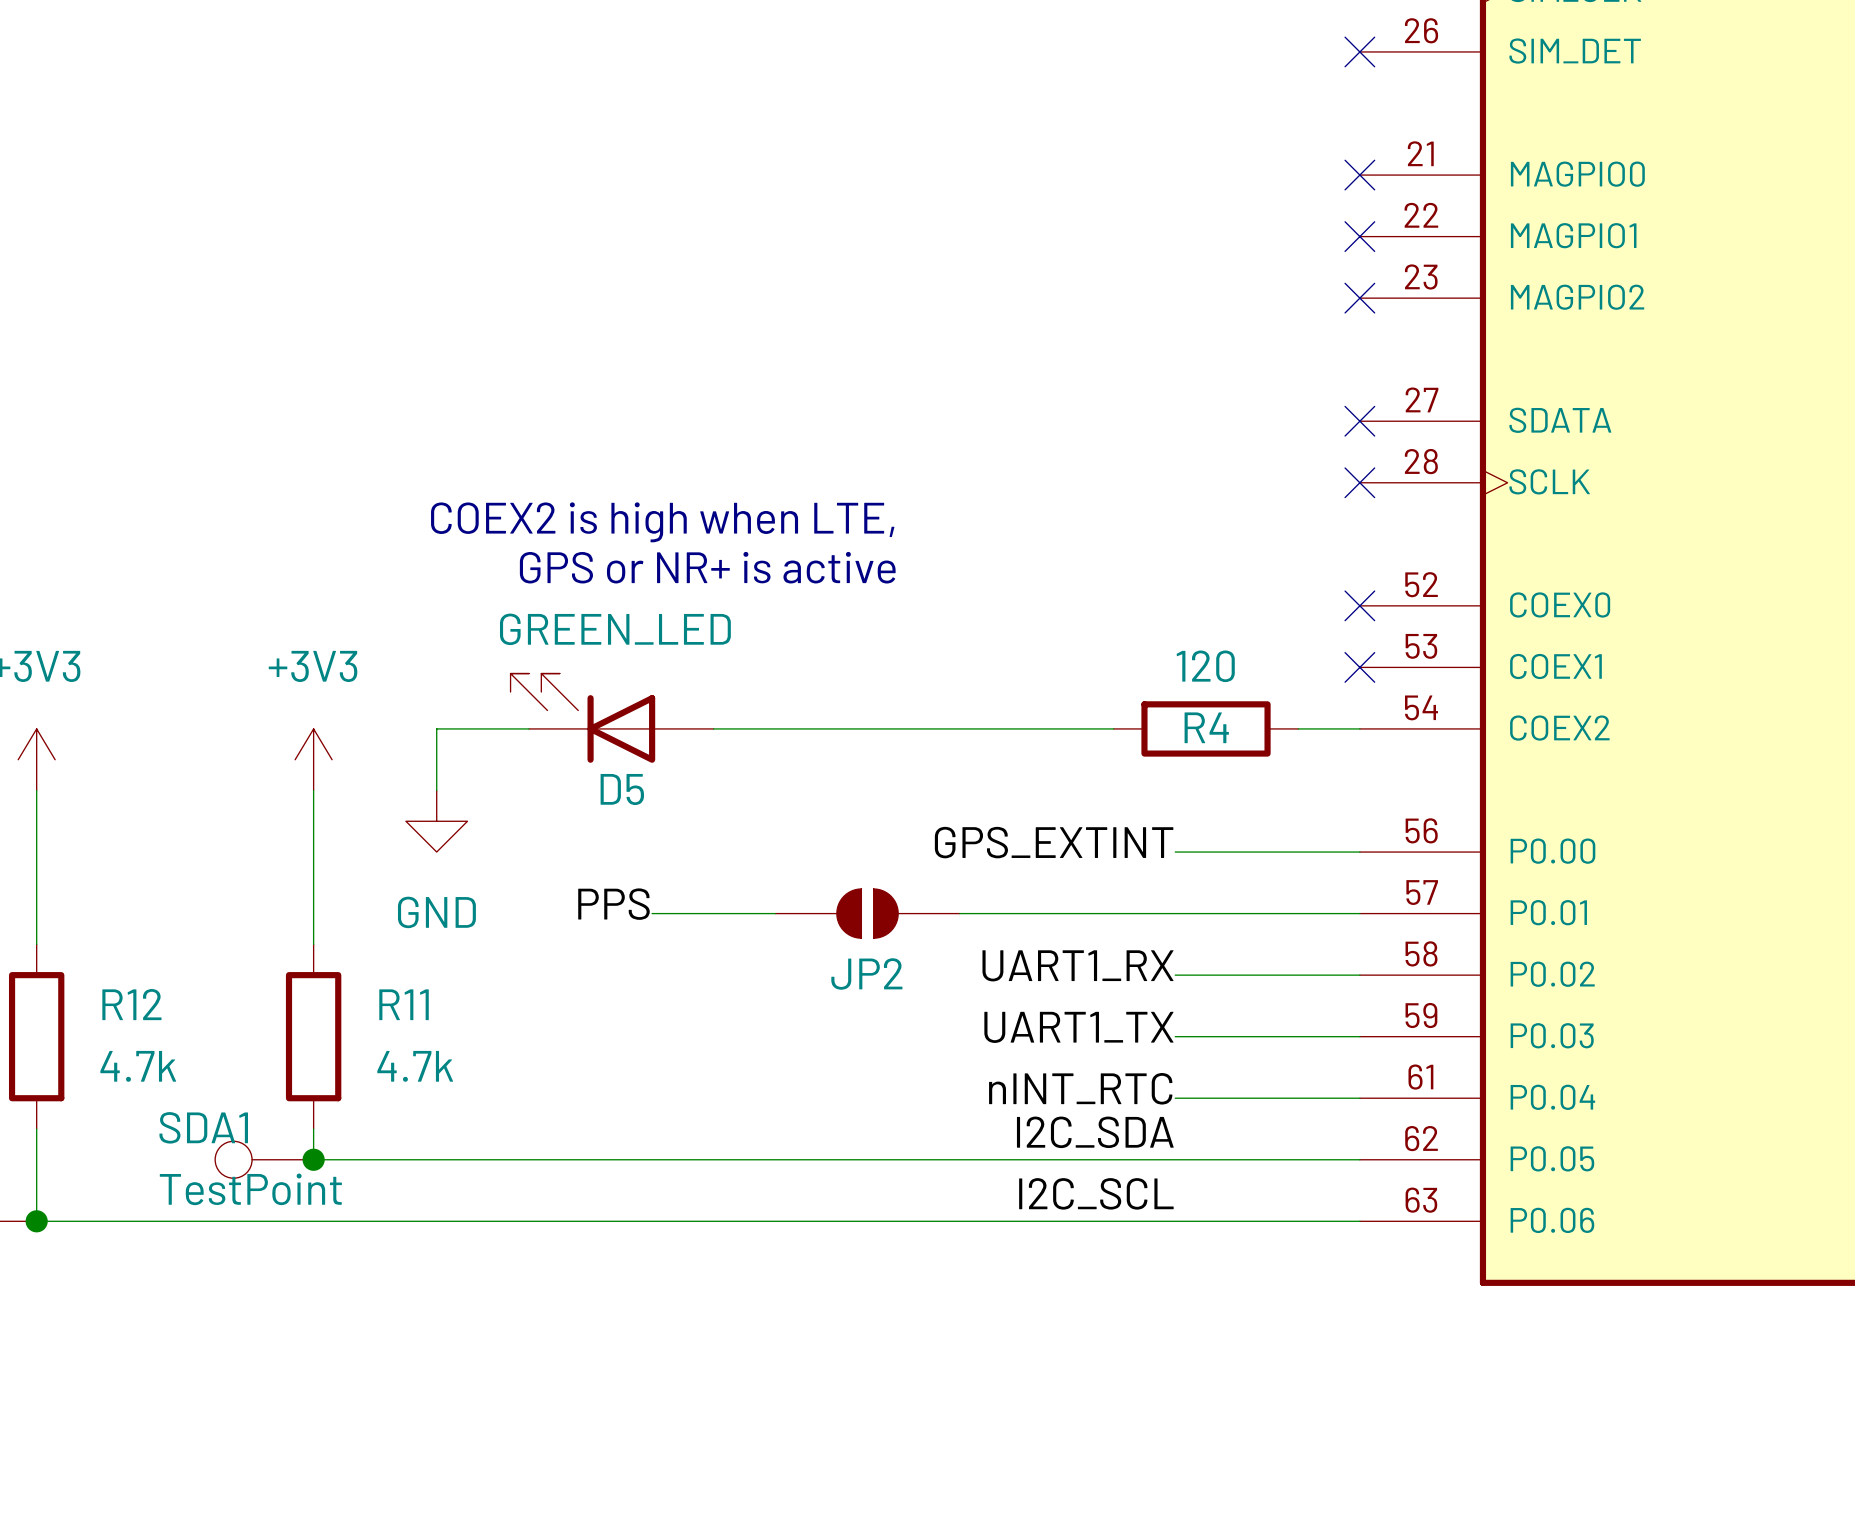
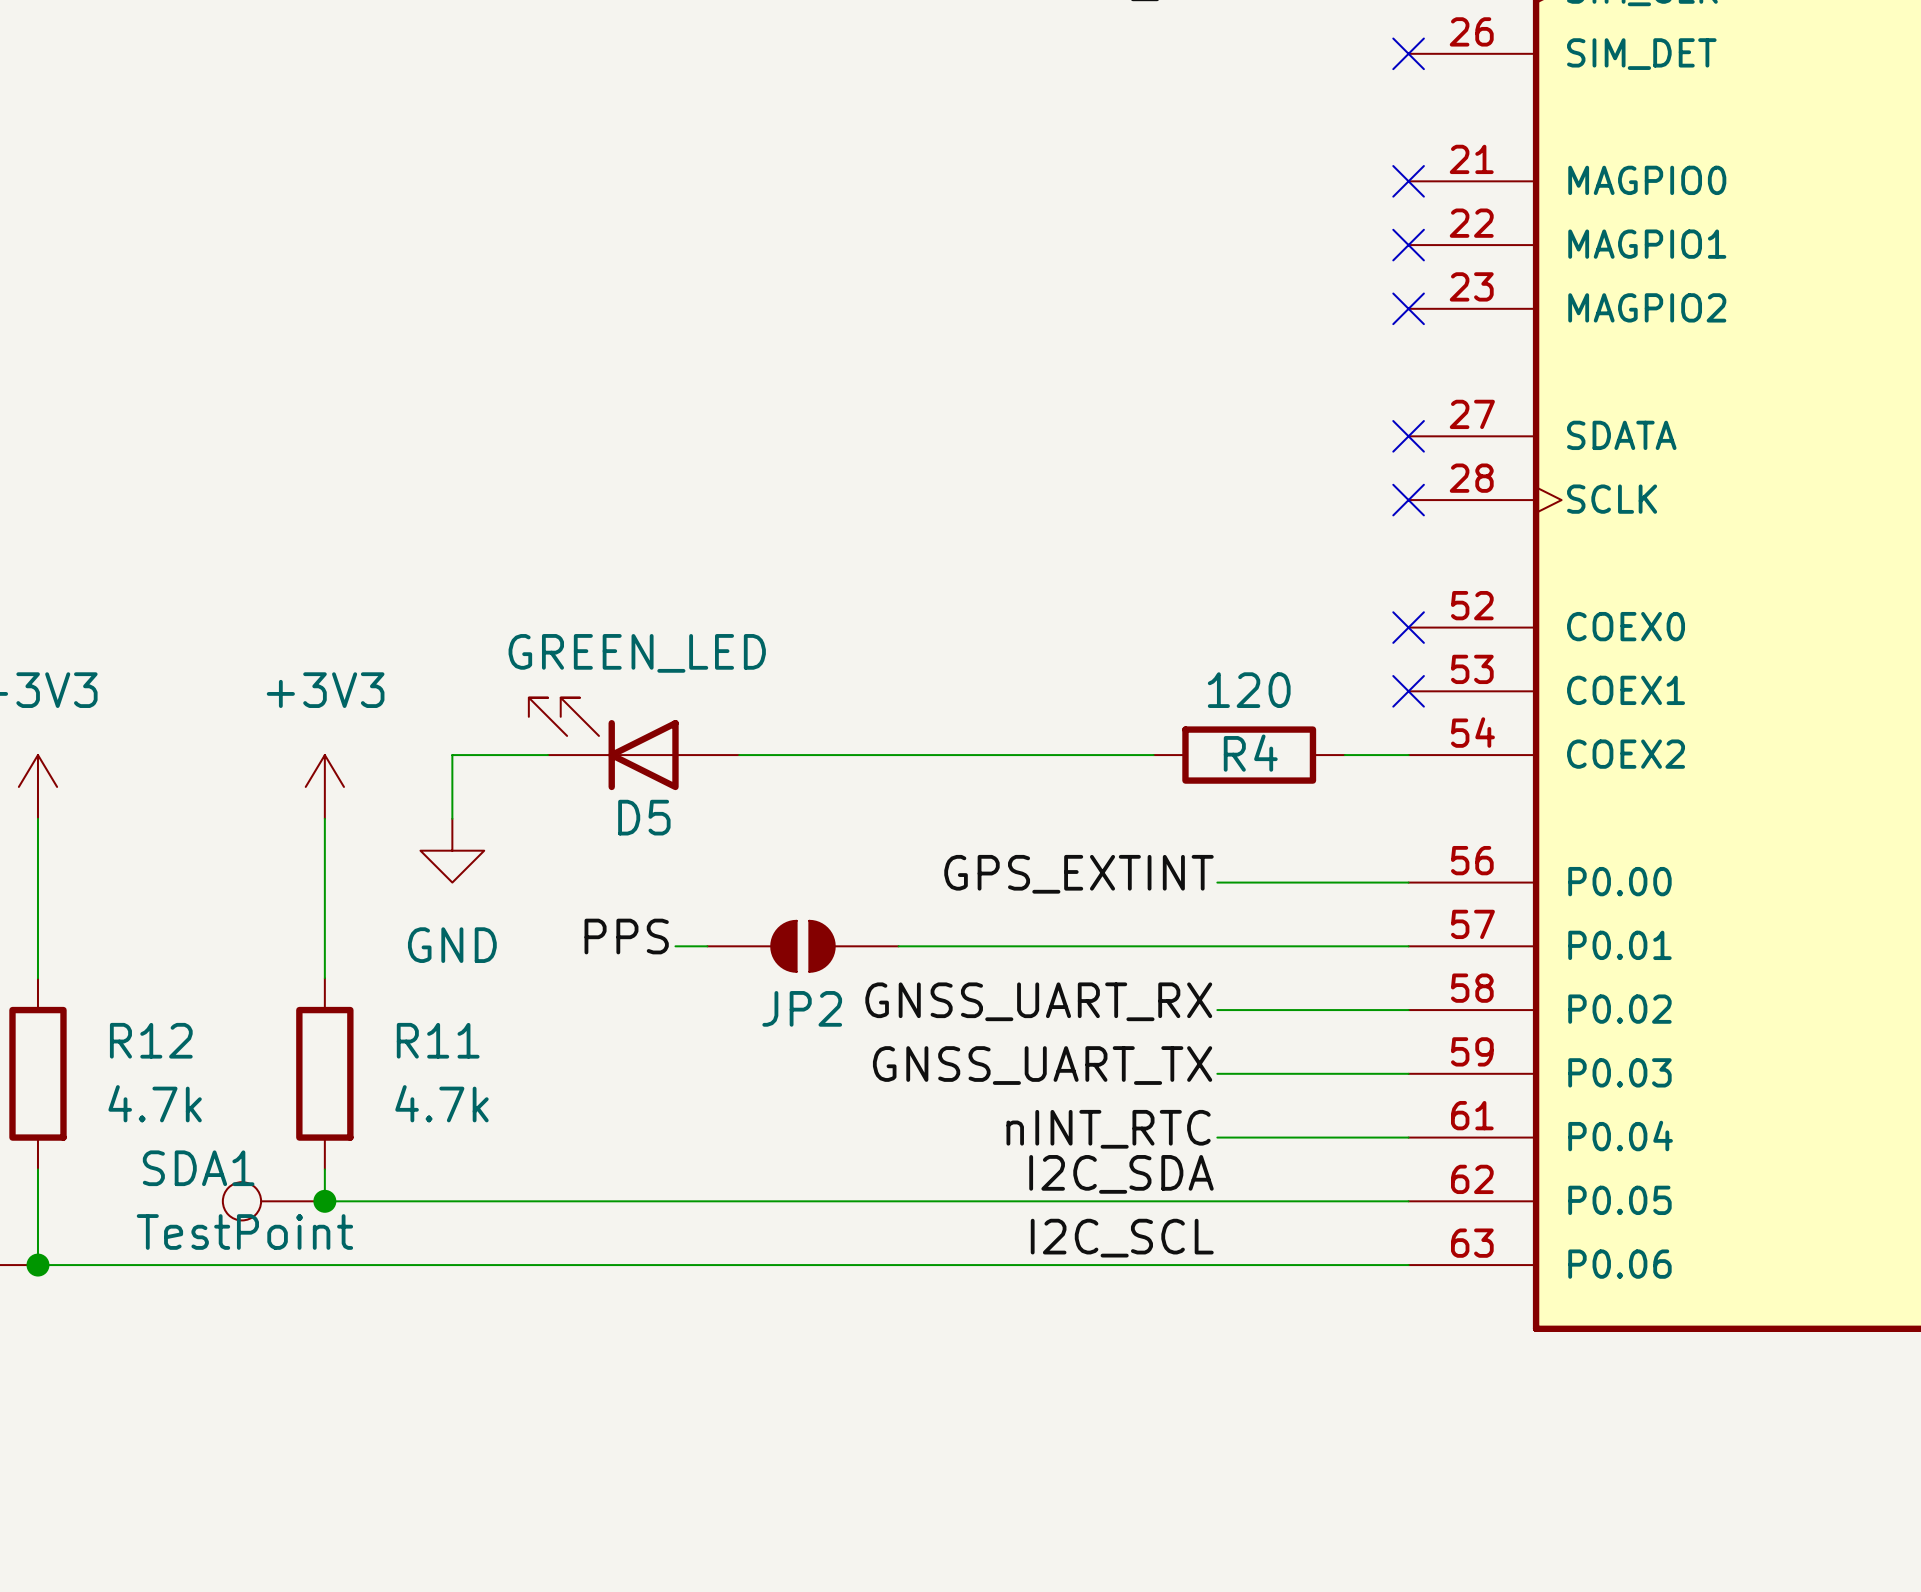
text: COEX2 is high when LTE, (662, 522) -> none
text: GPS or NR+ is active (707, 567) -> none
JP2 position: (867, 913) -> (802, 946)
label: UART1_RX (1078, 965) -> GNSS_UART_RX (1038, 1001)
label: UART1_TX (1078, 1027) -> GNSS_UART_TX (1042, 1065)

